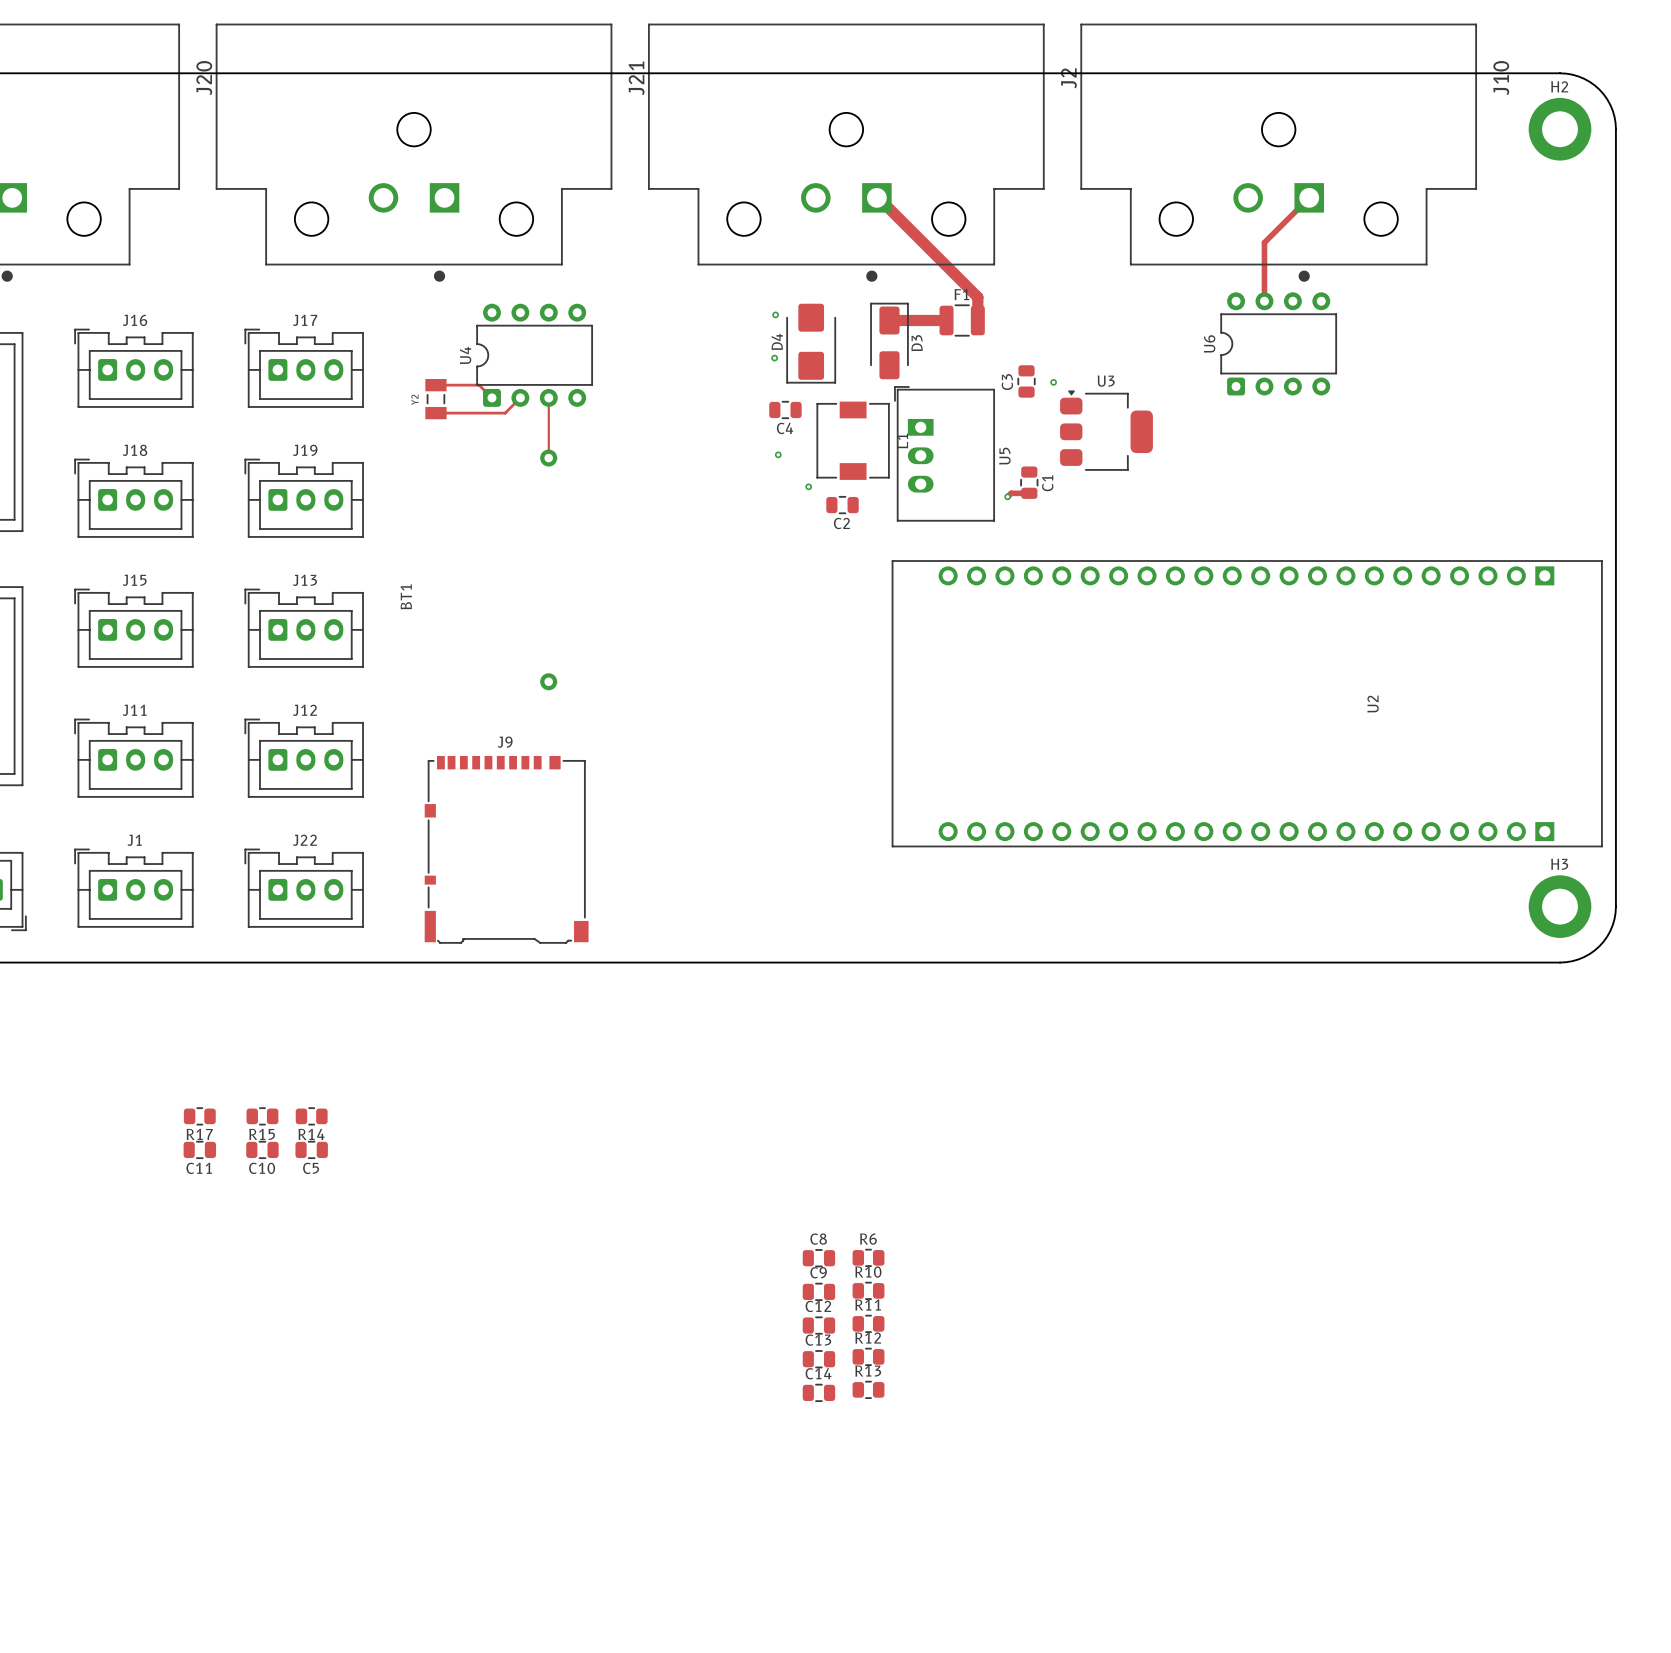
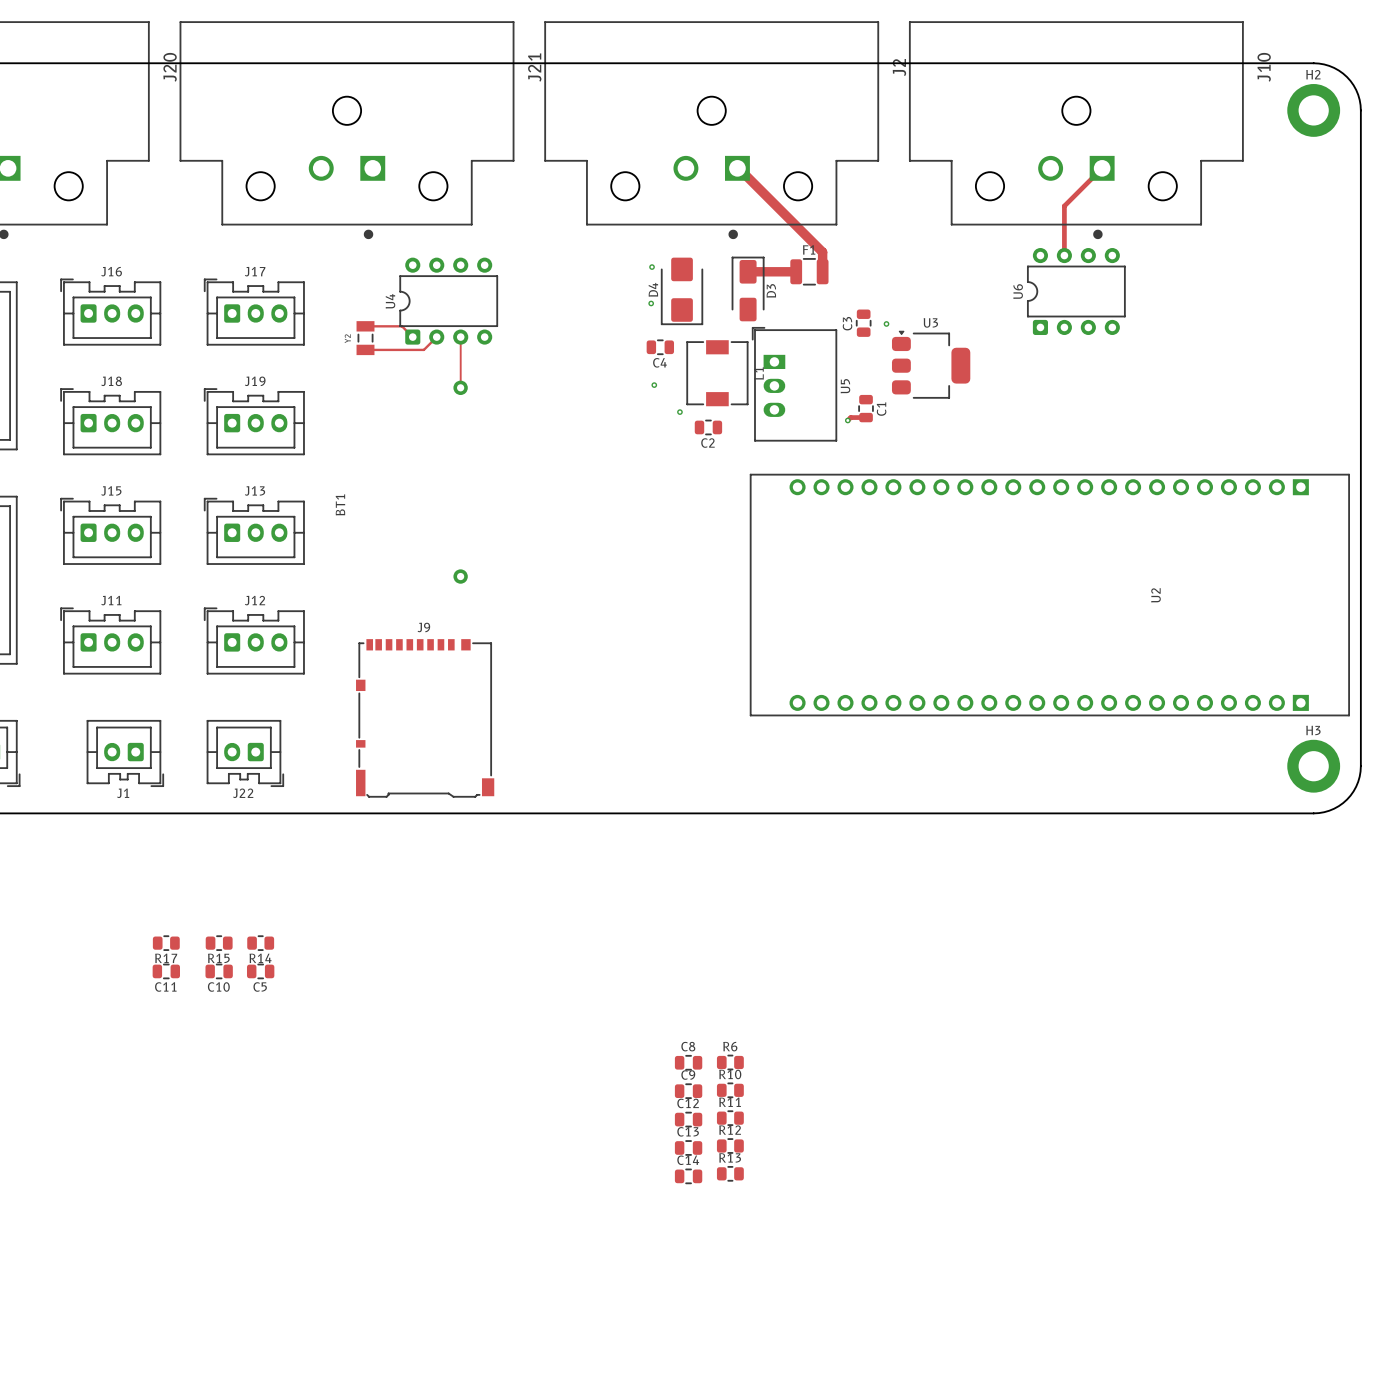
J1 name position: J1 (134, 840) -> J1 (123, 793)
J22 name position: J22 (304, 840) -> J22 (243, 793)
J1 footprint: [74, 848, 194, 928] -> [86, 720, 164, 787]
J22 footprint: [244, 848, 364, 928] -> [206, 720, 284, 787]

